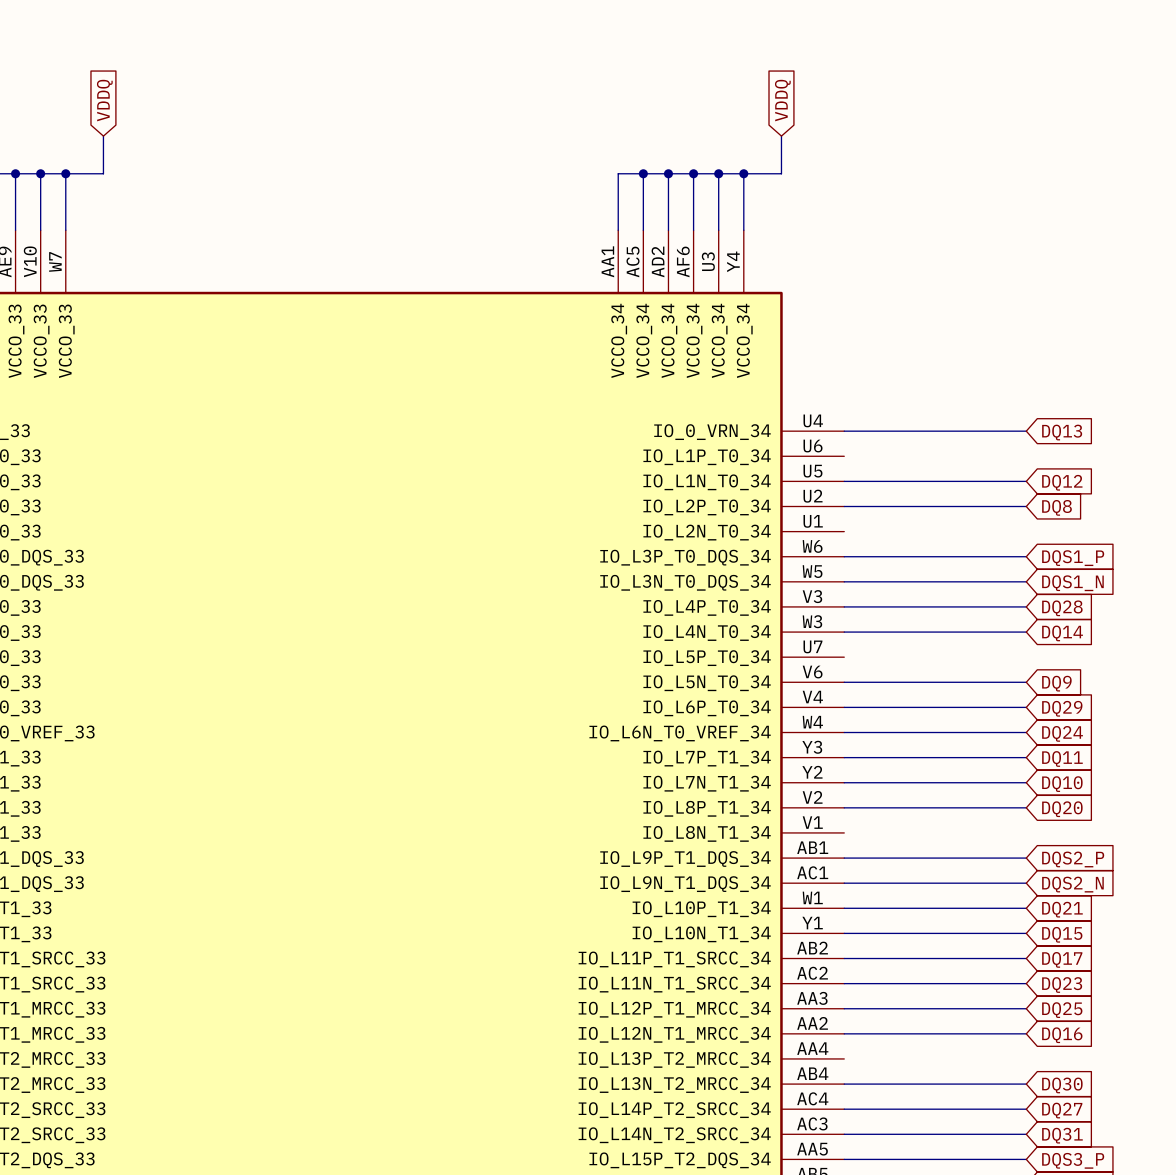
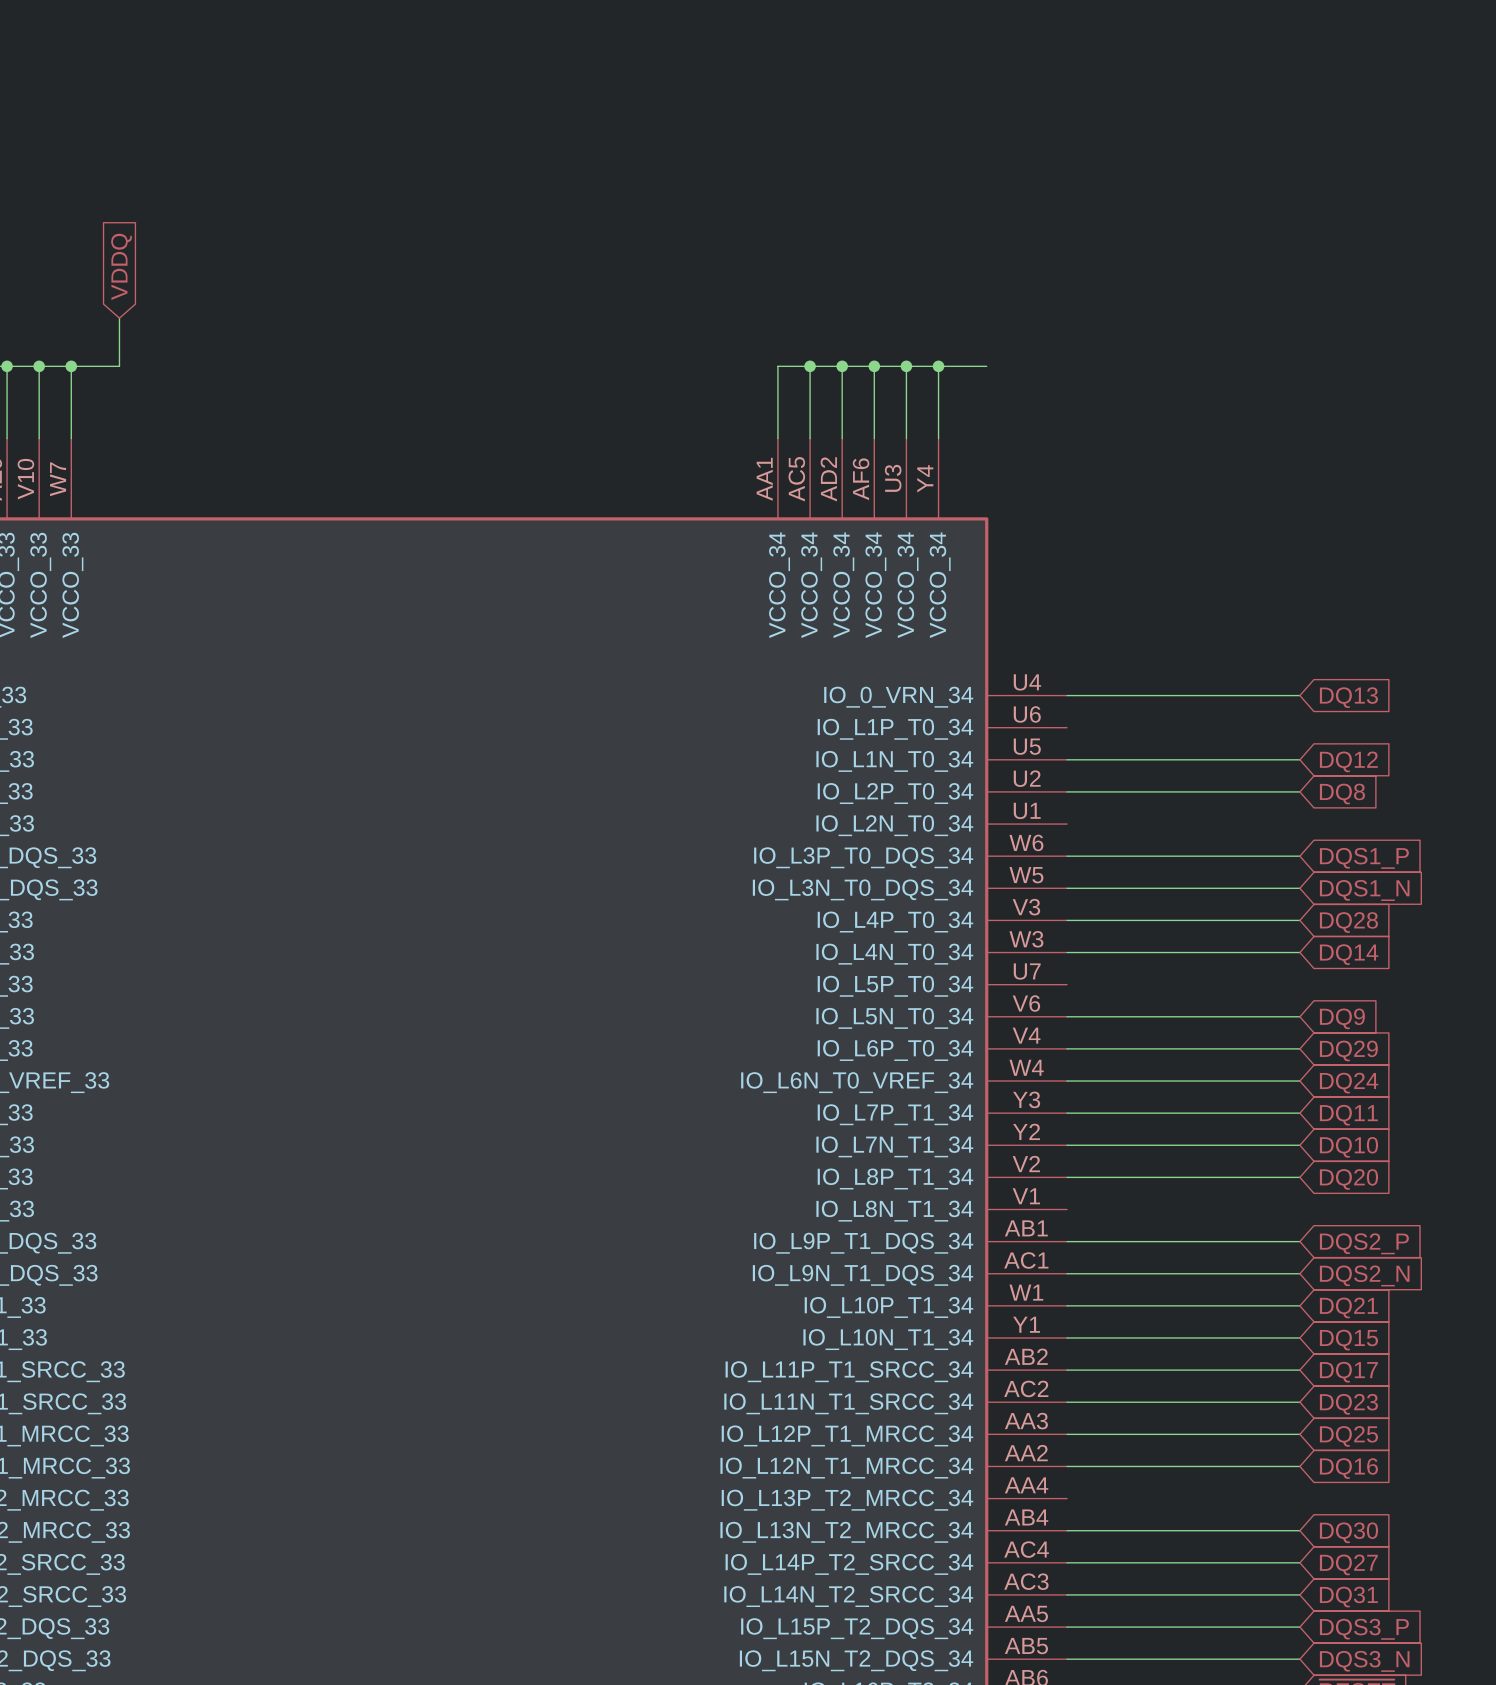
global label: VDDQ (782, 100) -> none
wire: (781, 136) (781, 173) -> none

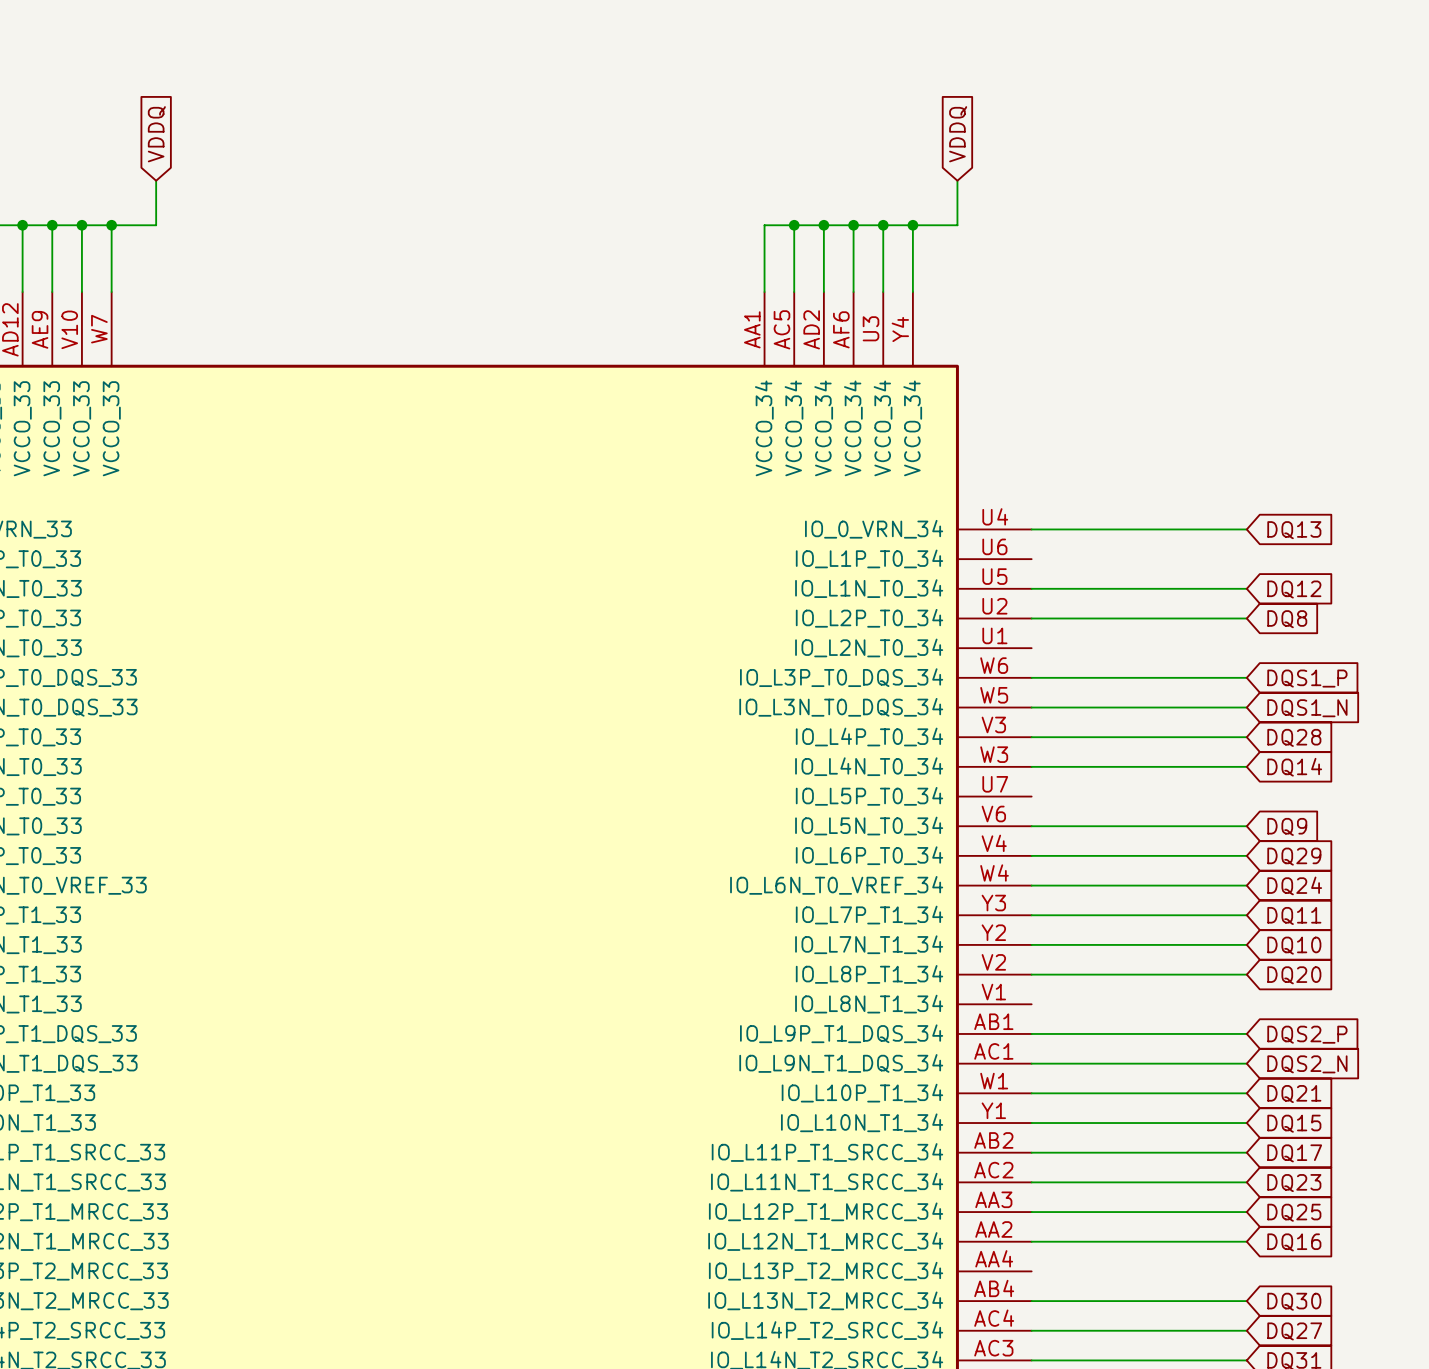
global label: none -> VDDQ (958, 134)
wire: none -> (957, 180) (957, 225)

